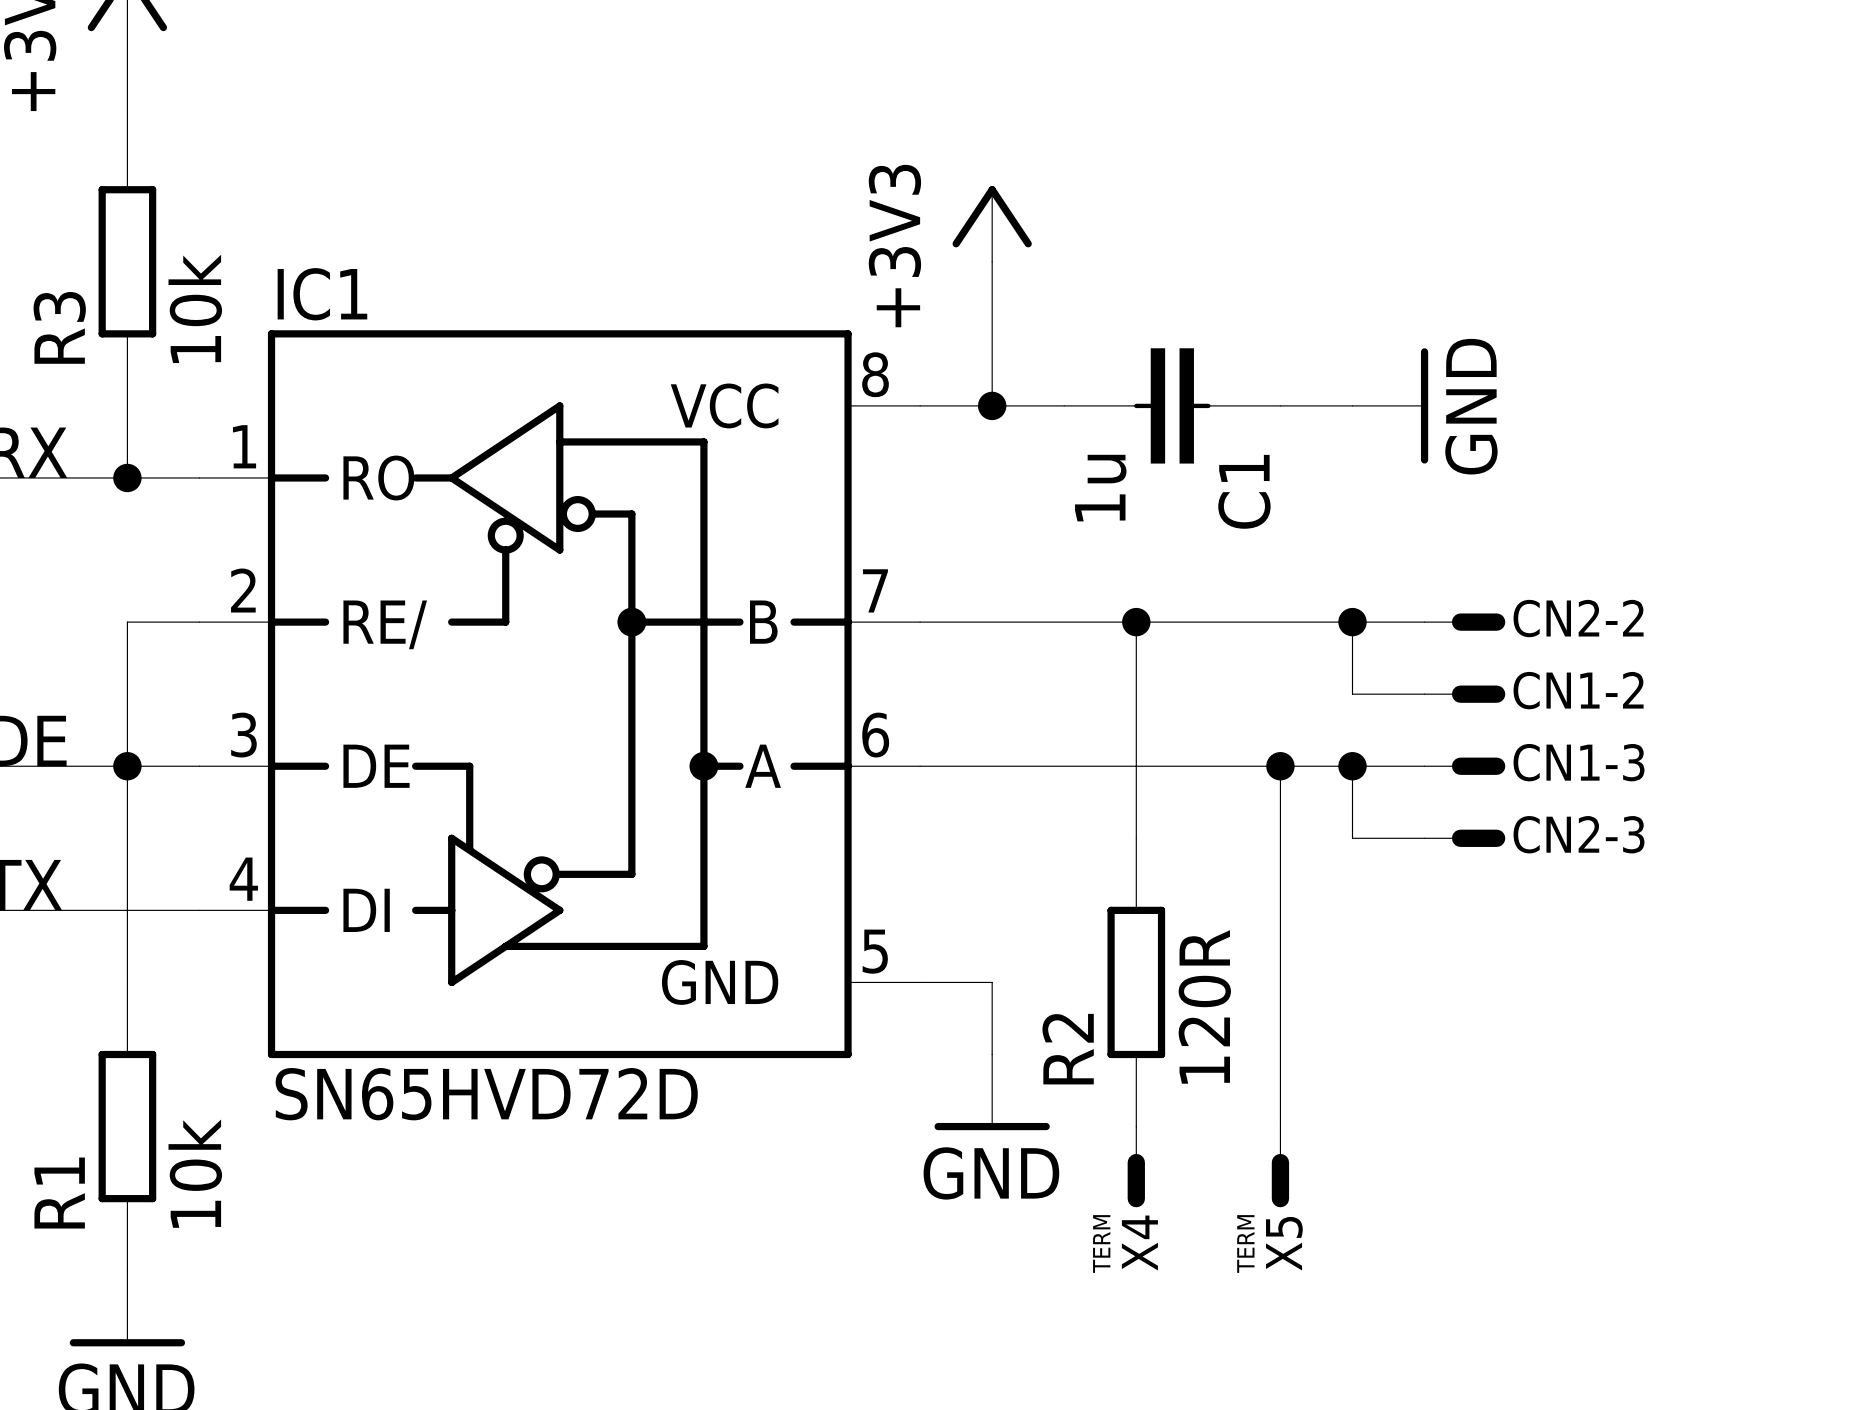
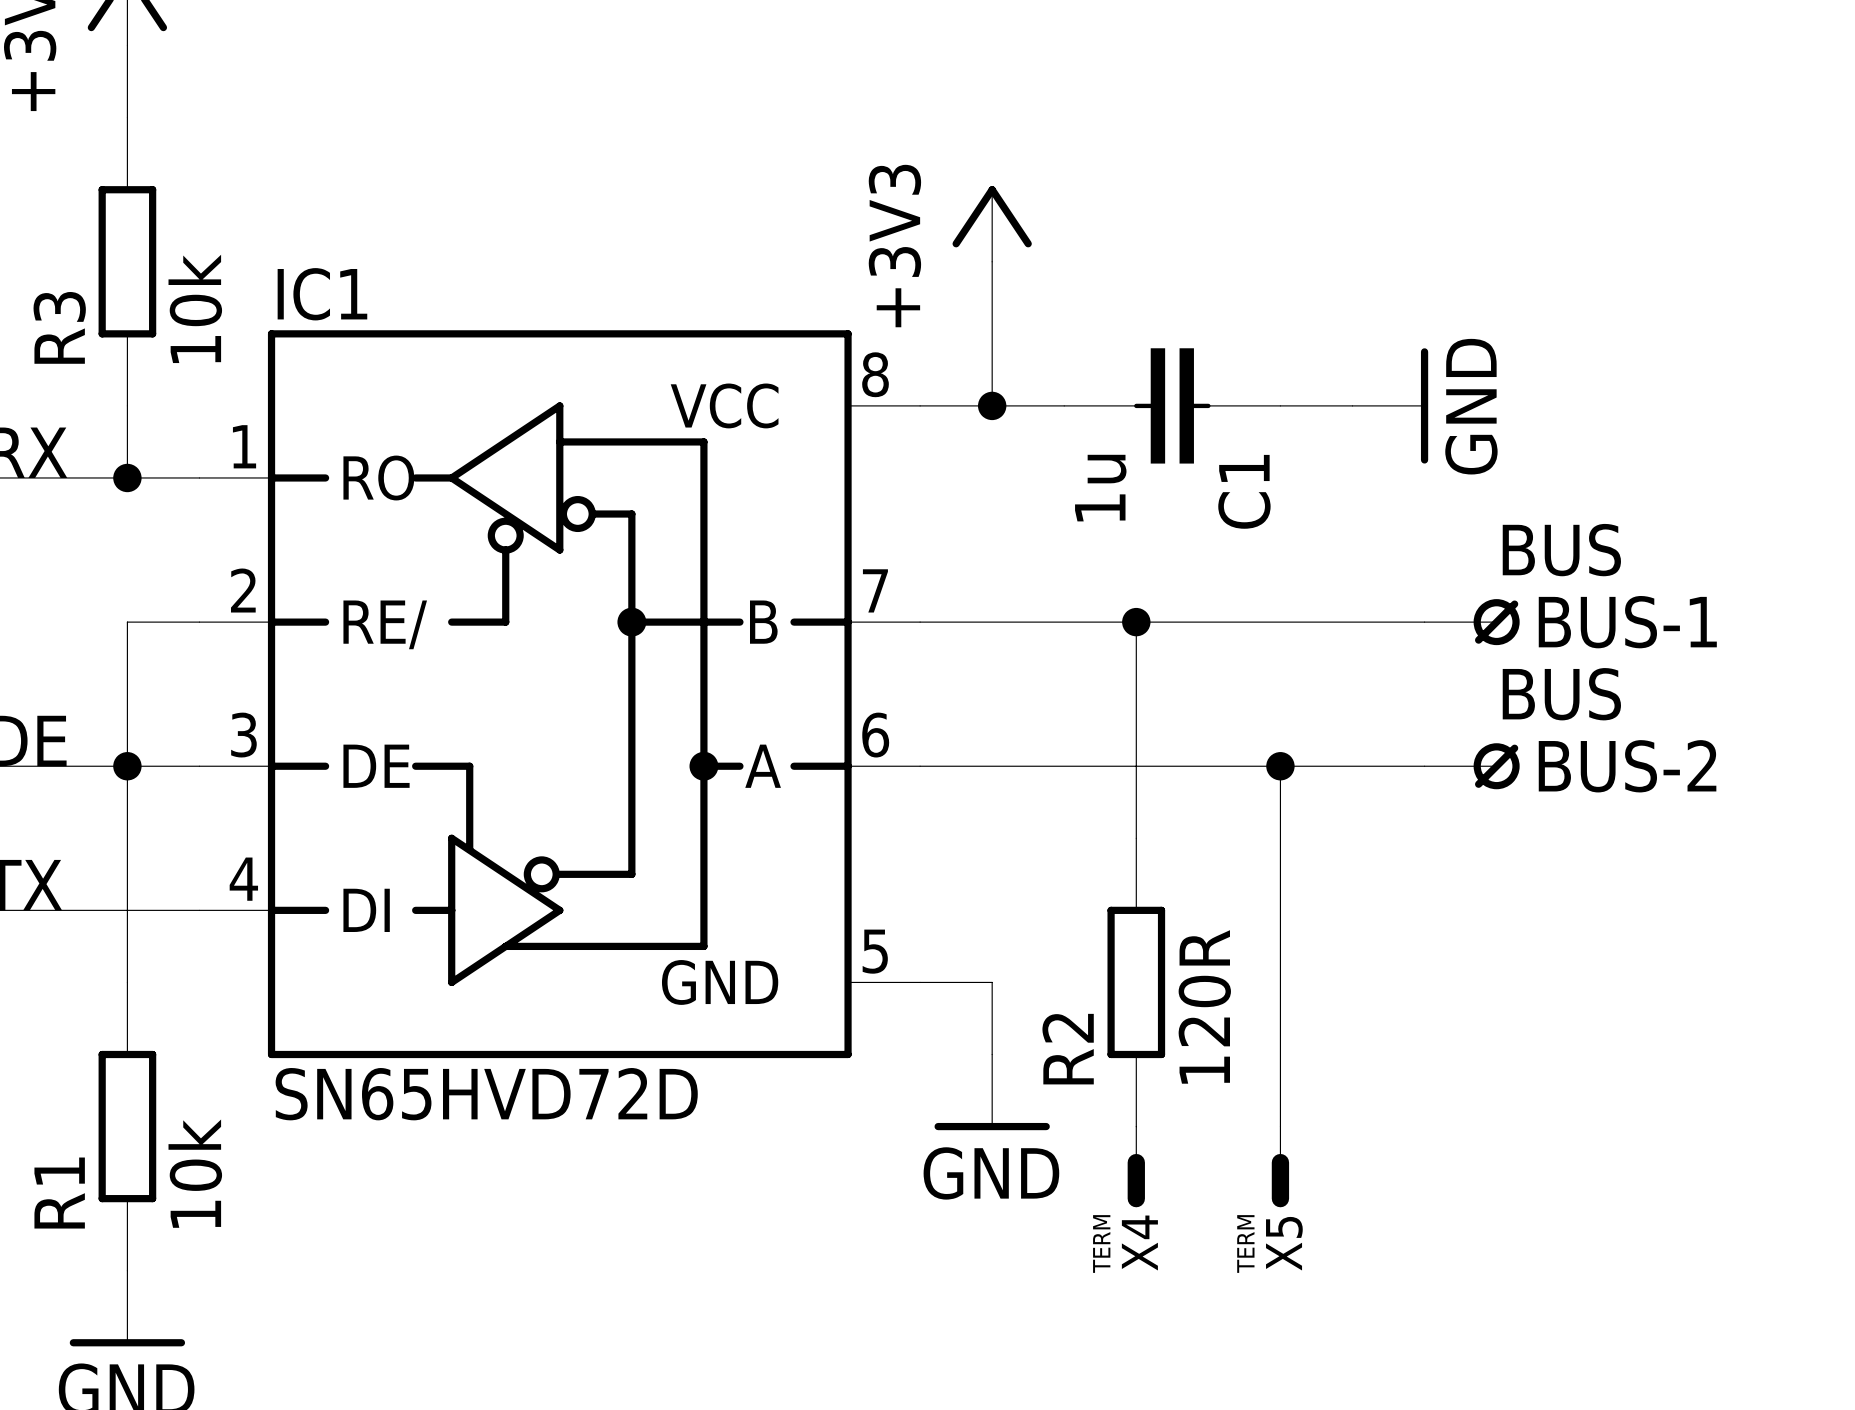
wire: (1352, 622) (1352, 694) (1424, 694) -> none
junction: (1352, 622) -> none
CN2-2: (1464, 622) -> none
BUS-1: none -> BUS (1472, 622)
CN1-2: (1464, 694) -> none
wire: (1352, 766) (1352, 838) (1424, 838) -> none
junction: (1352, 766) -> none
CN1-3: (1464, 766) -> none
BUS-2: none -> BUS (1472, 766)
CN2-3: (1464, 838) -> none

